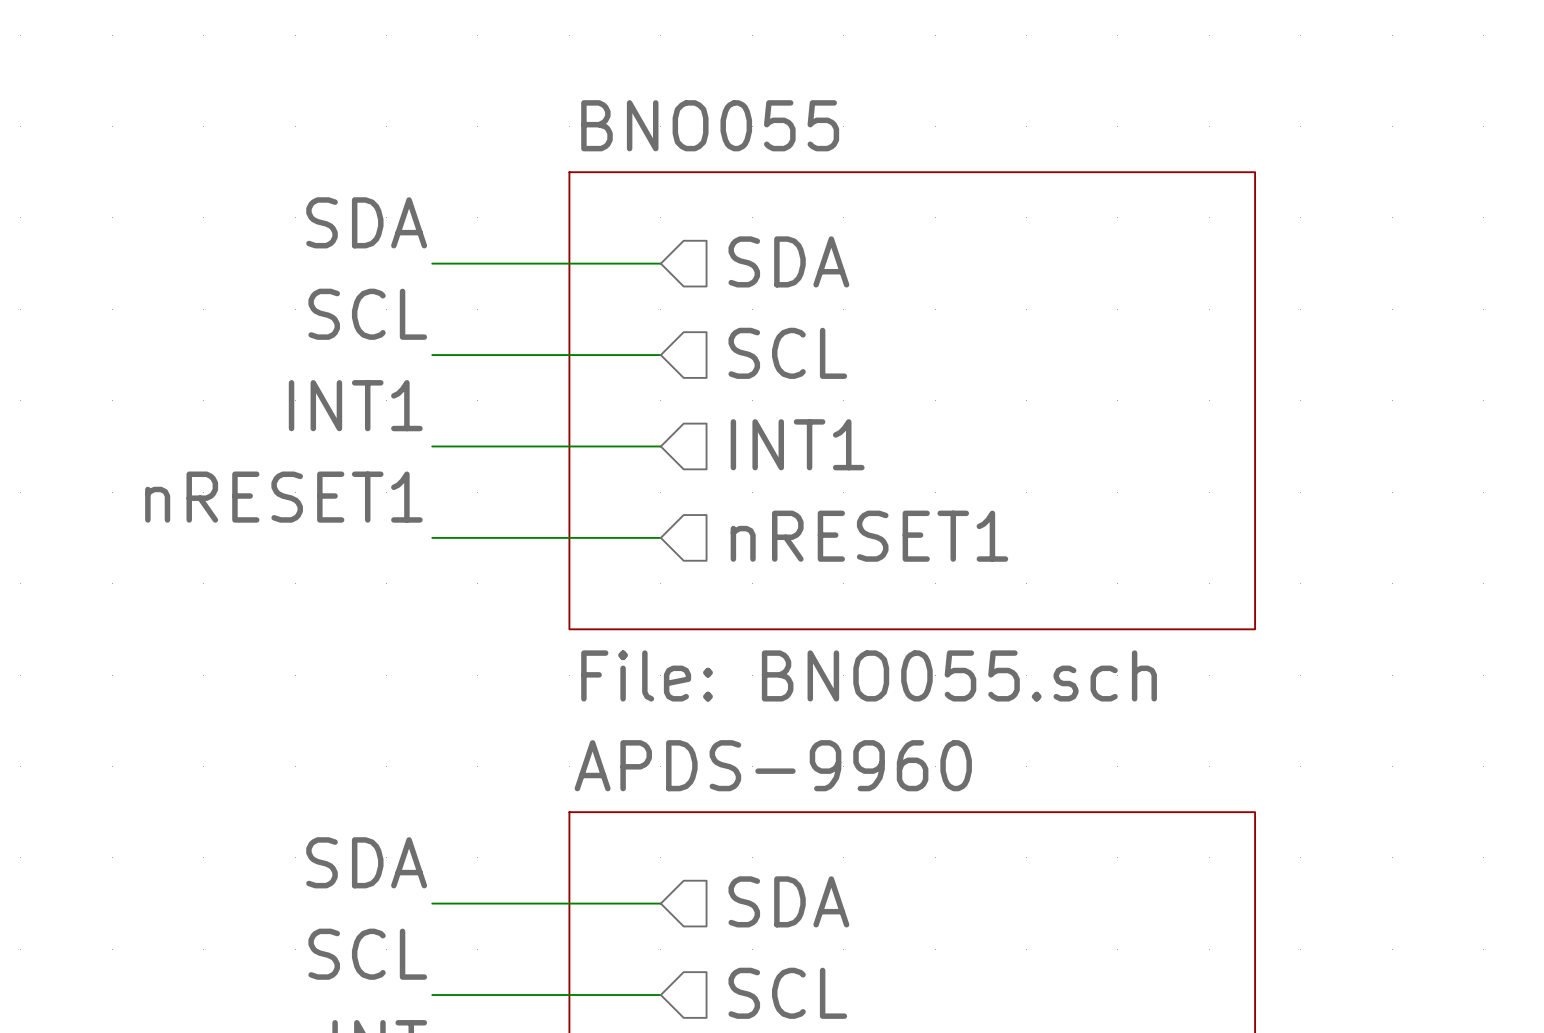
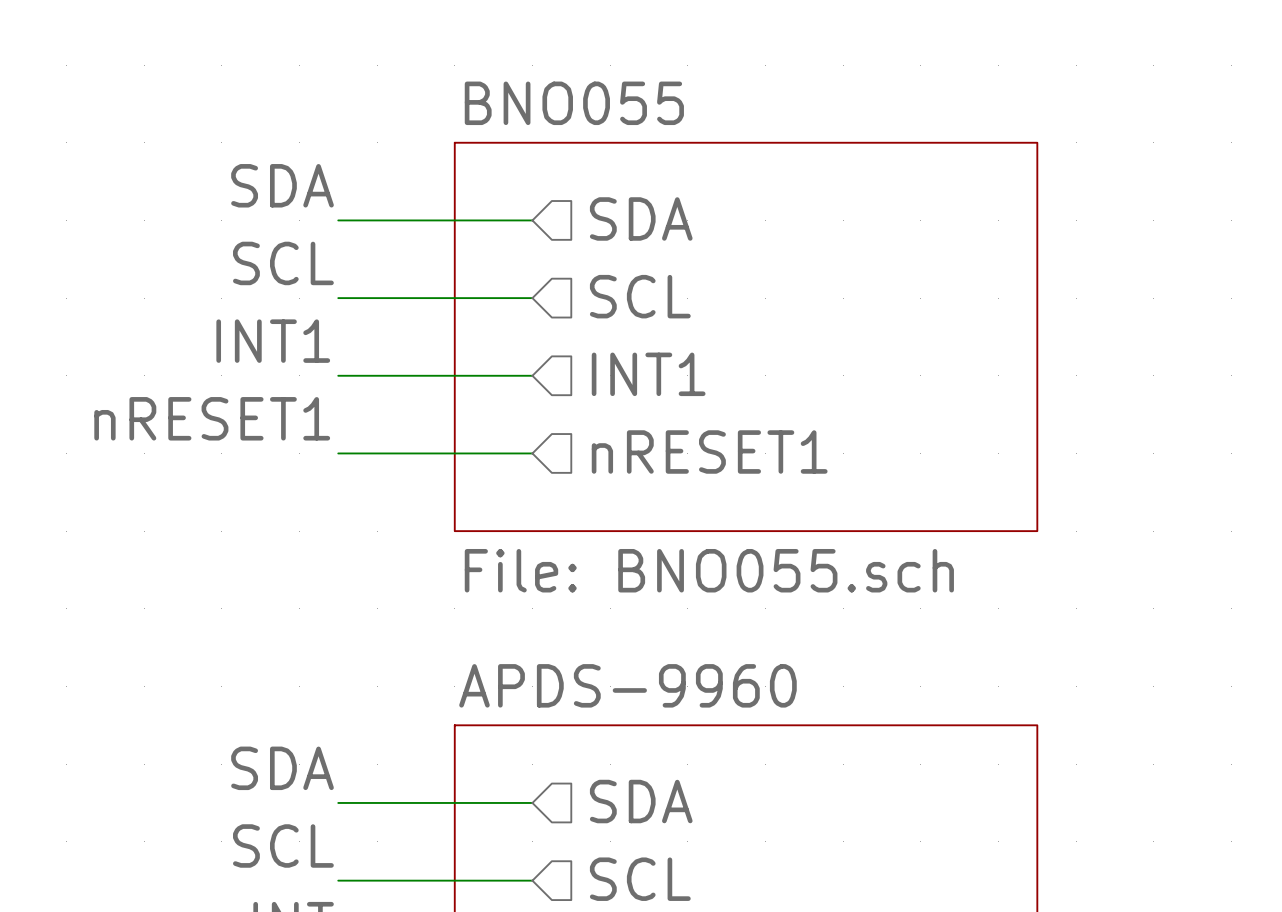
label position: SDA (366, 222) -> SDA (282, 185)
hierarchical label position: SDA (788, 261) -> SDA (641, 218)
wire: (432, 263) (660, 263) -> (338, 220) (532, 220)
label position: SCL (367, 314) -> SCL (283, 263)
hierarchical label position: SCL (787, 353) -> SCL (640, 296)
wire: (432, 355) (660, 355) -> (338, 298) (532, 298)
sheet BNO055 position: (912, 400) -> (746, 336)
label position: INT1 (355, 405) -> INT1 (273, 341)
hierarchical label position: INT1 (797, 444) -> INT1 (648, 374)
wire: (432, 446) (660, 446) -> (338, 375) (532, 375)
label position: nRESET1 (283, 497) -> nRESET1 (212, 418)
hierarchical label position: nRESET1 (869, 536) -> nRESET1 (709, 452)
wire: (432, 537) (660, 537) -> (338, 453) (532, 453)

